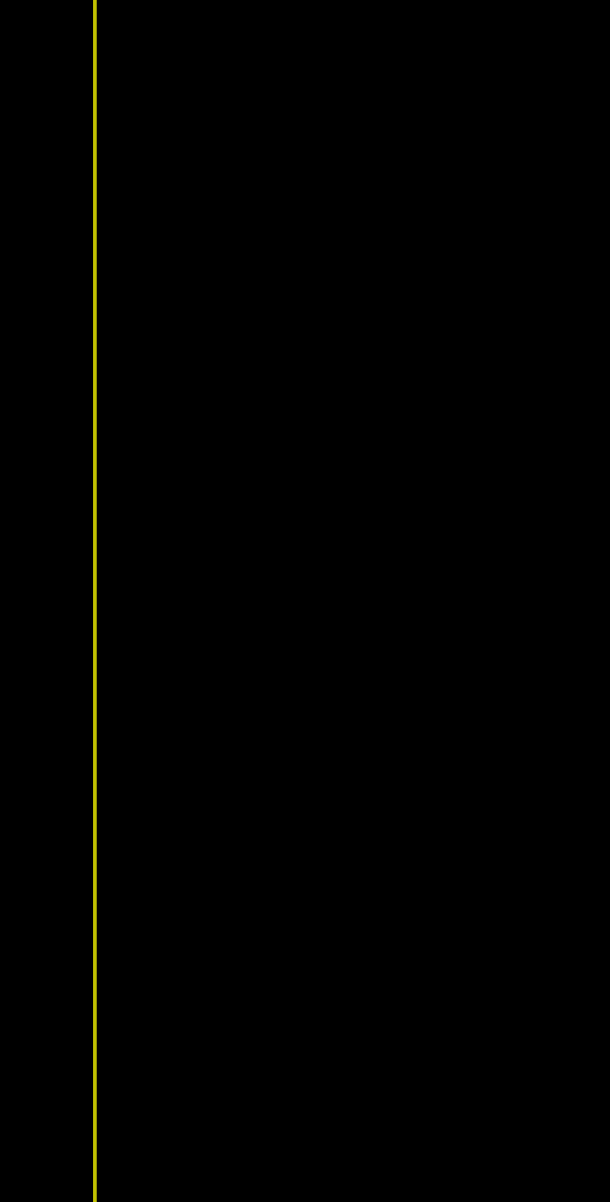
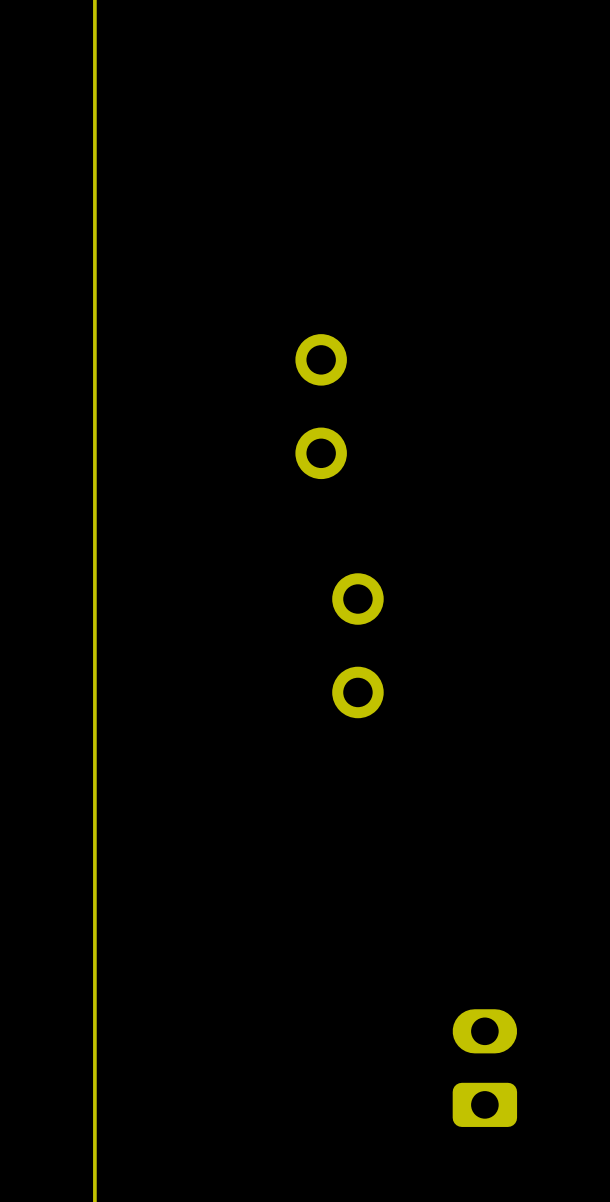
part: none -> (321, 406)
part: none -> (357, 645)
part: none -> (484, 1068)

